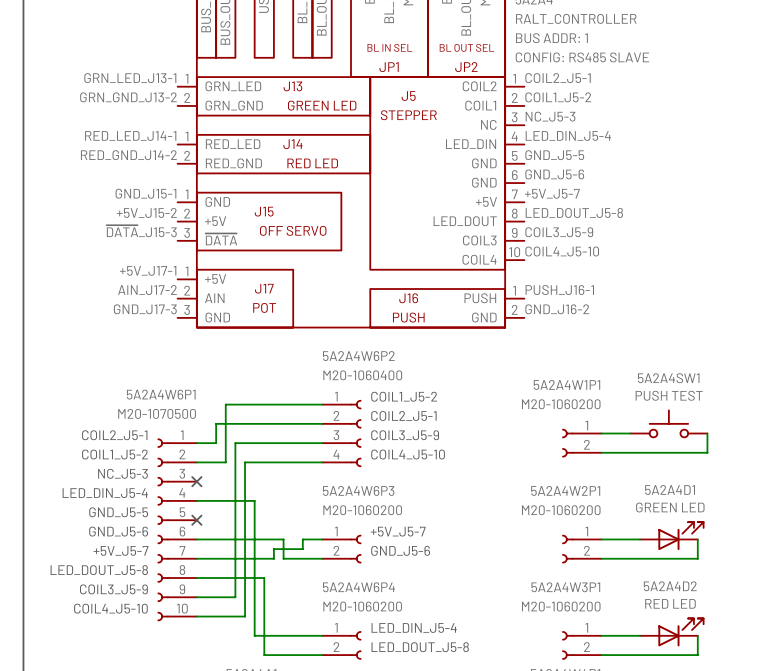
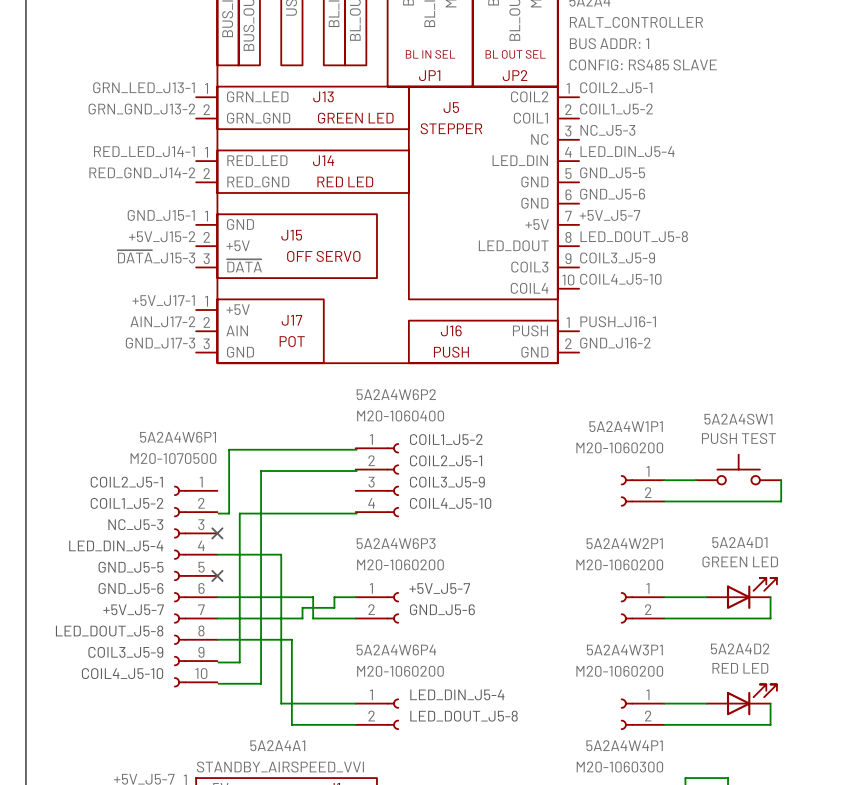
wire: (322, 404) (225, 404) (225, 462) (196, 462) -> none
wire: none -> (356, 449) (229, 449) (229, 513) (218, 513)
wire: (322, 423) (216, 423) (216, 443) (196, 443) -> none
wire: none -> (356, 471) (261, 471) (261, 683) (218, 683)
wire: (322, 443) (235, 443) (235, 597) (196, 597) -> none
wire: (322, 462) (245, 462) (245, 616) (196, 616) -> none
wire: none -> (356, 513) (239, 513) (239, 662) (218, 662)

